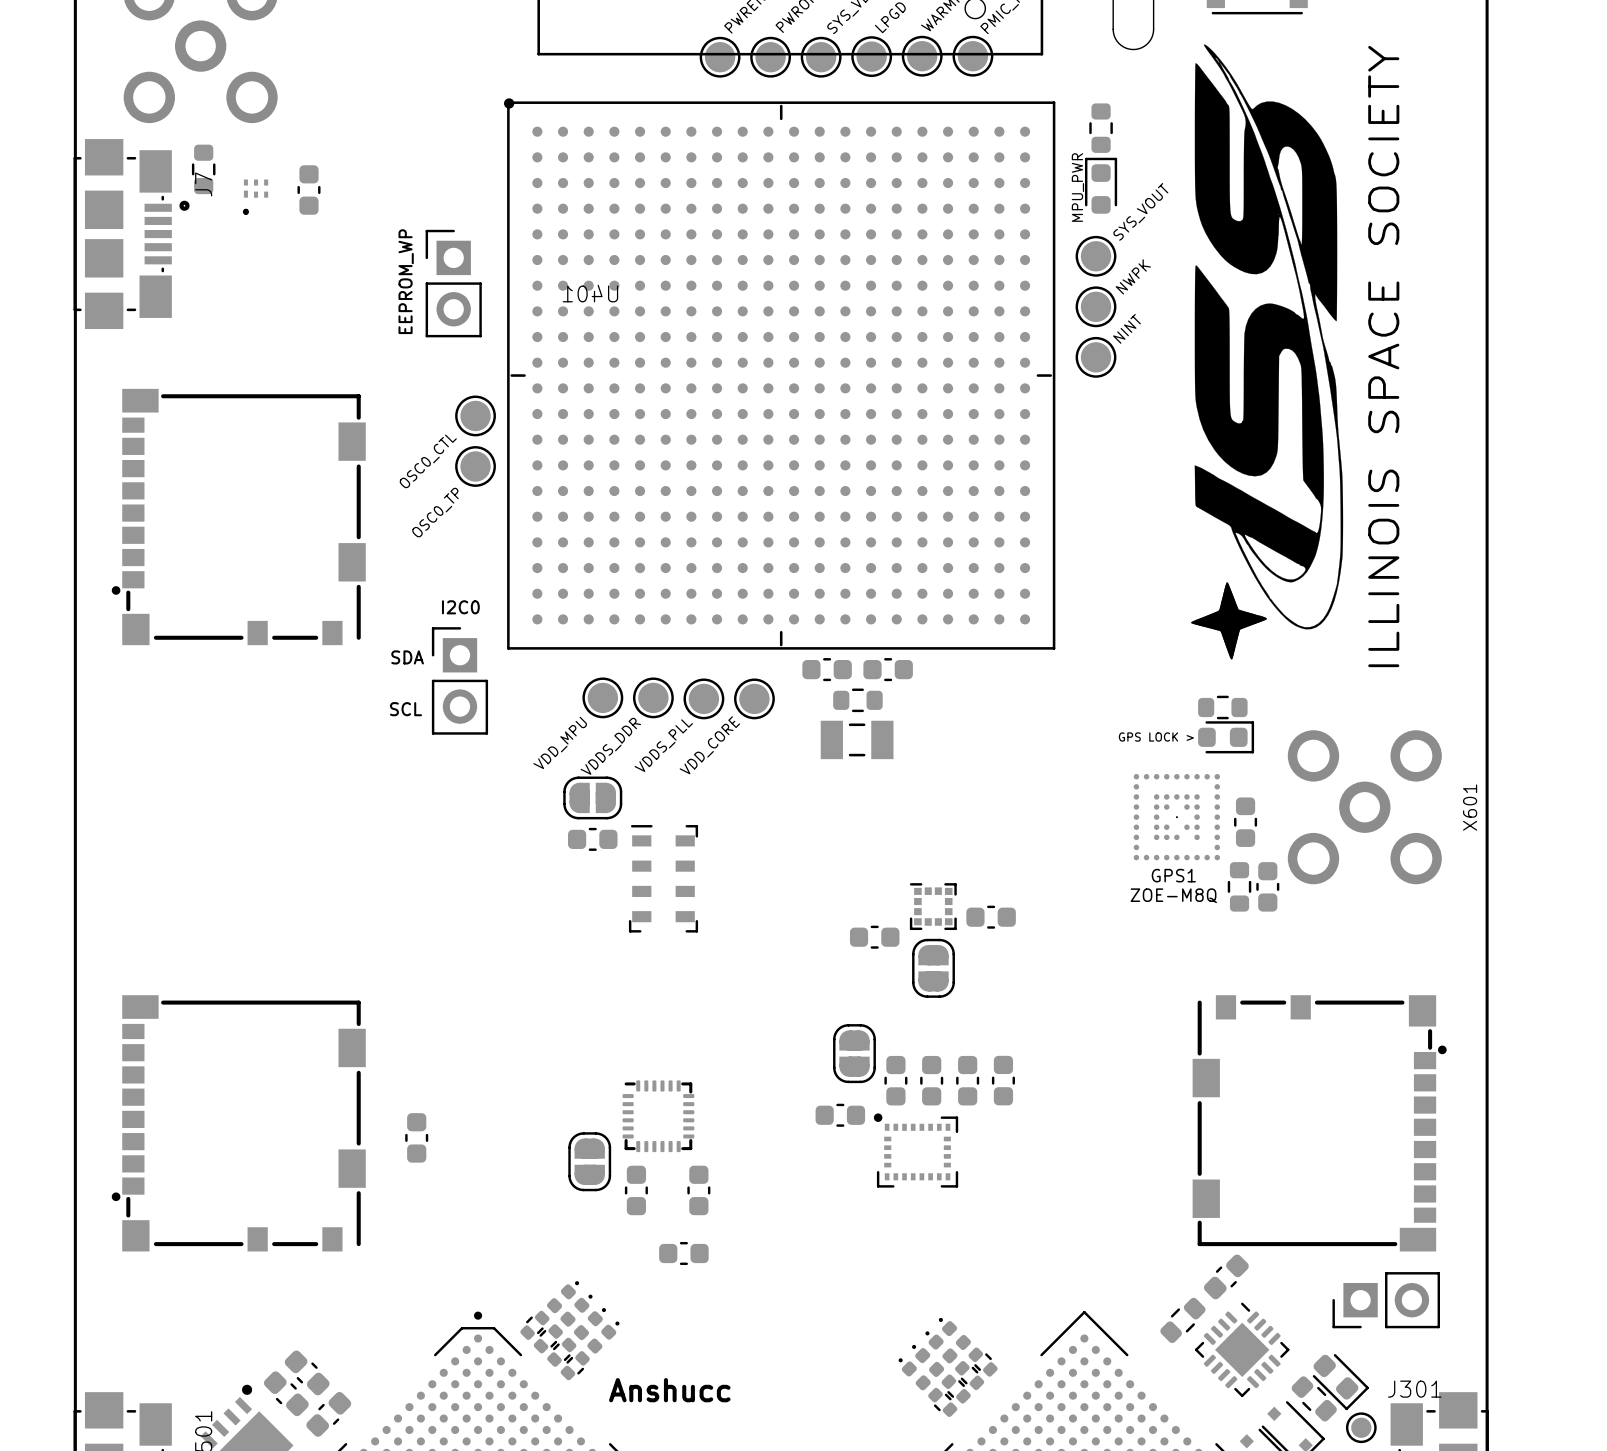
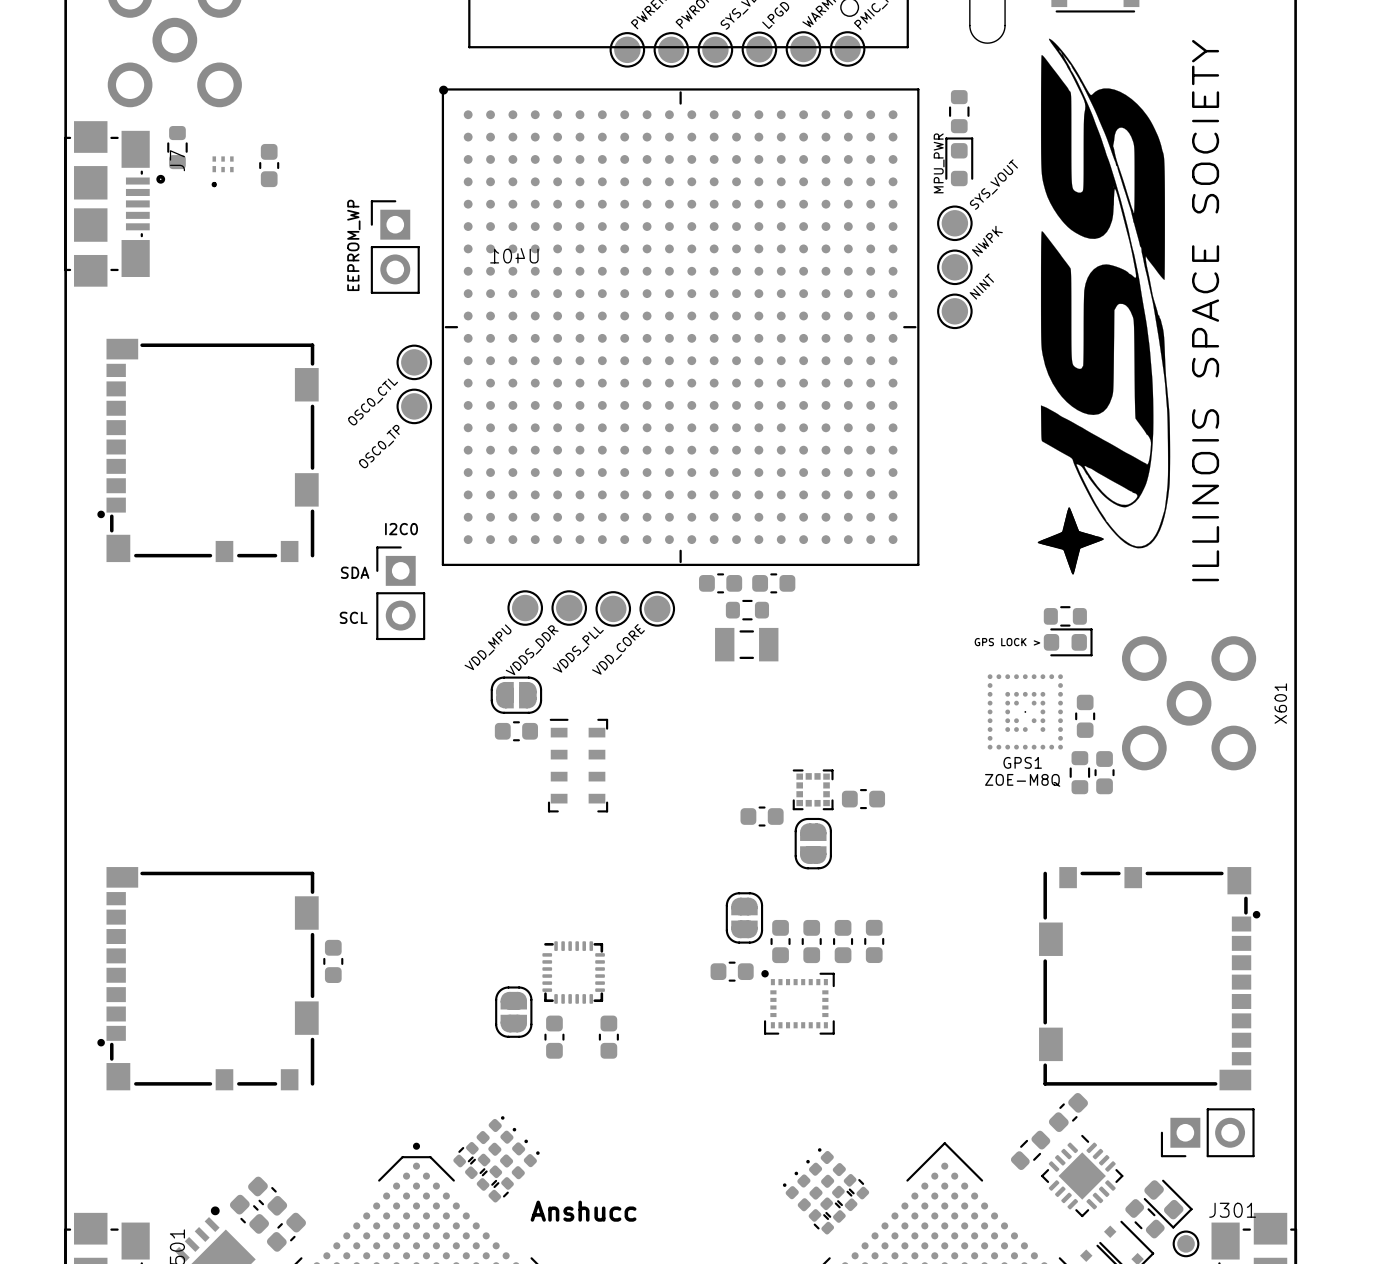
part position: (416, 1137) -> (333, 961)
part: (683, 1253) -> none

